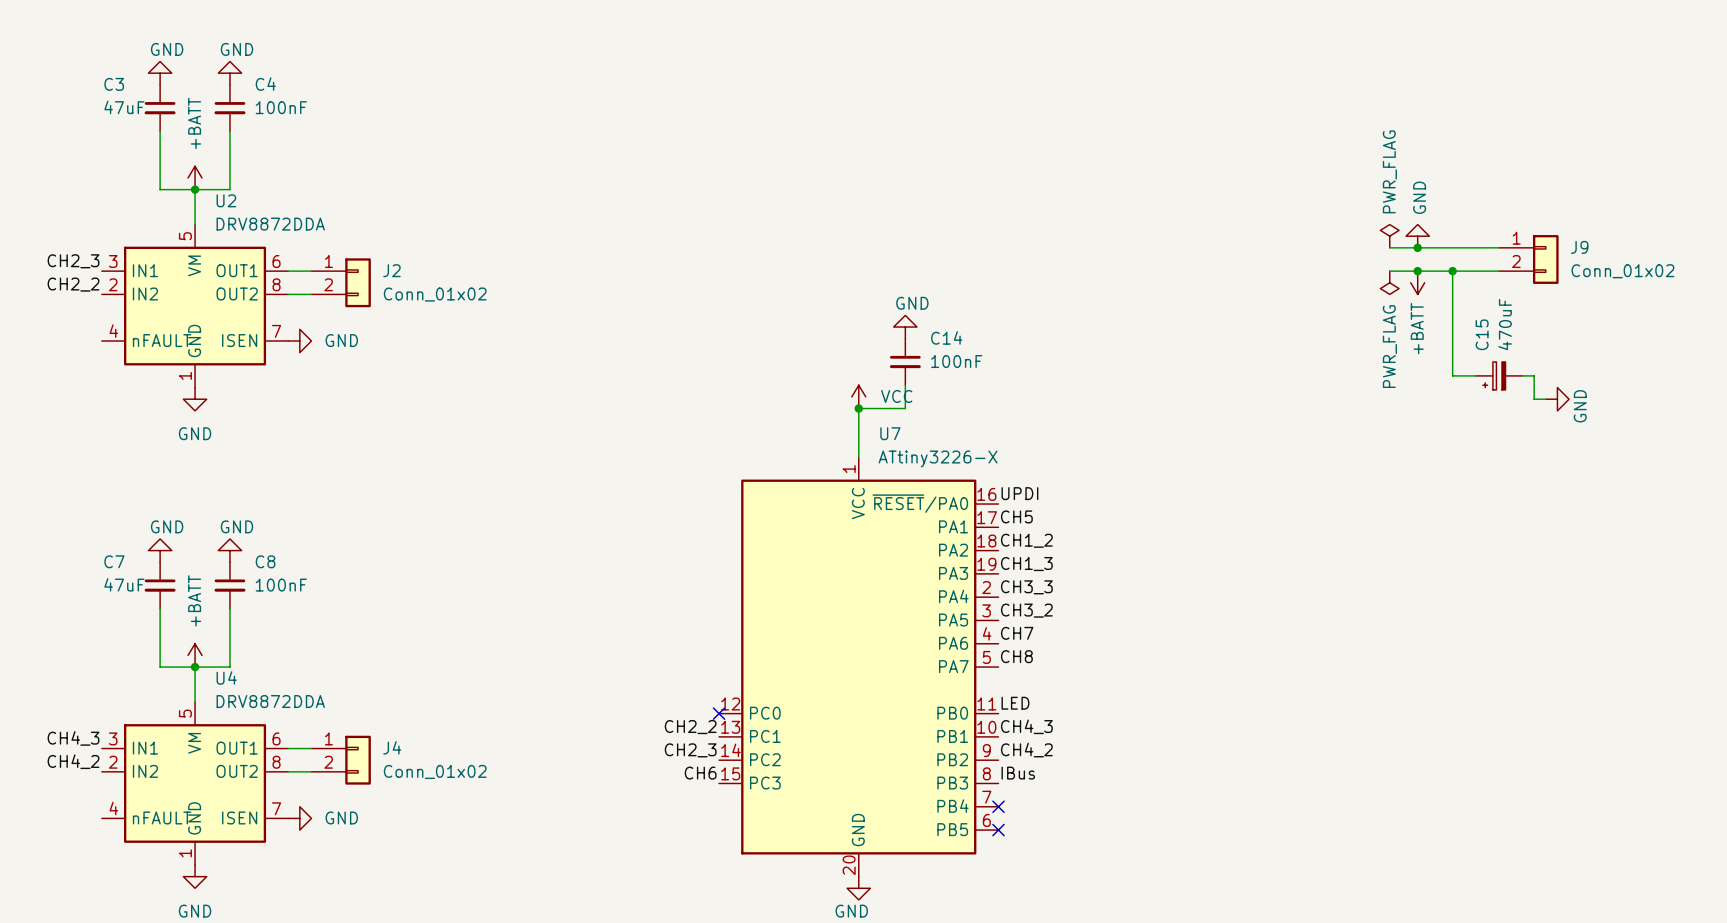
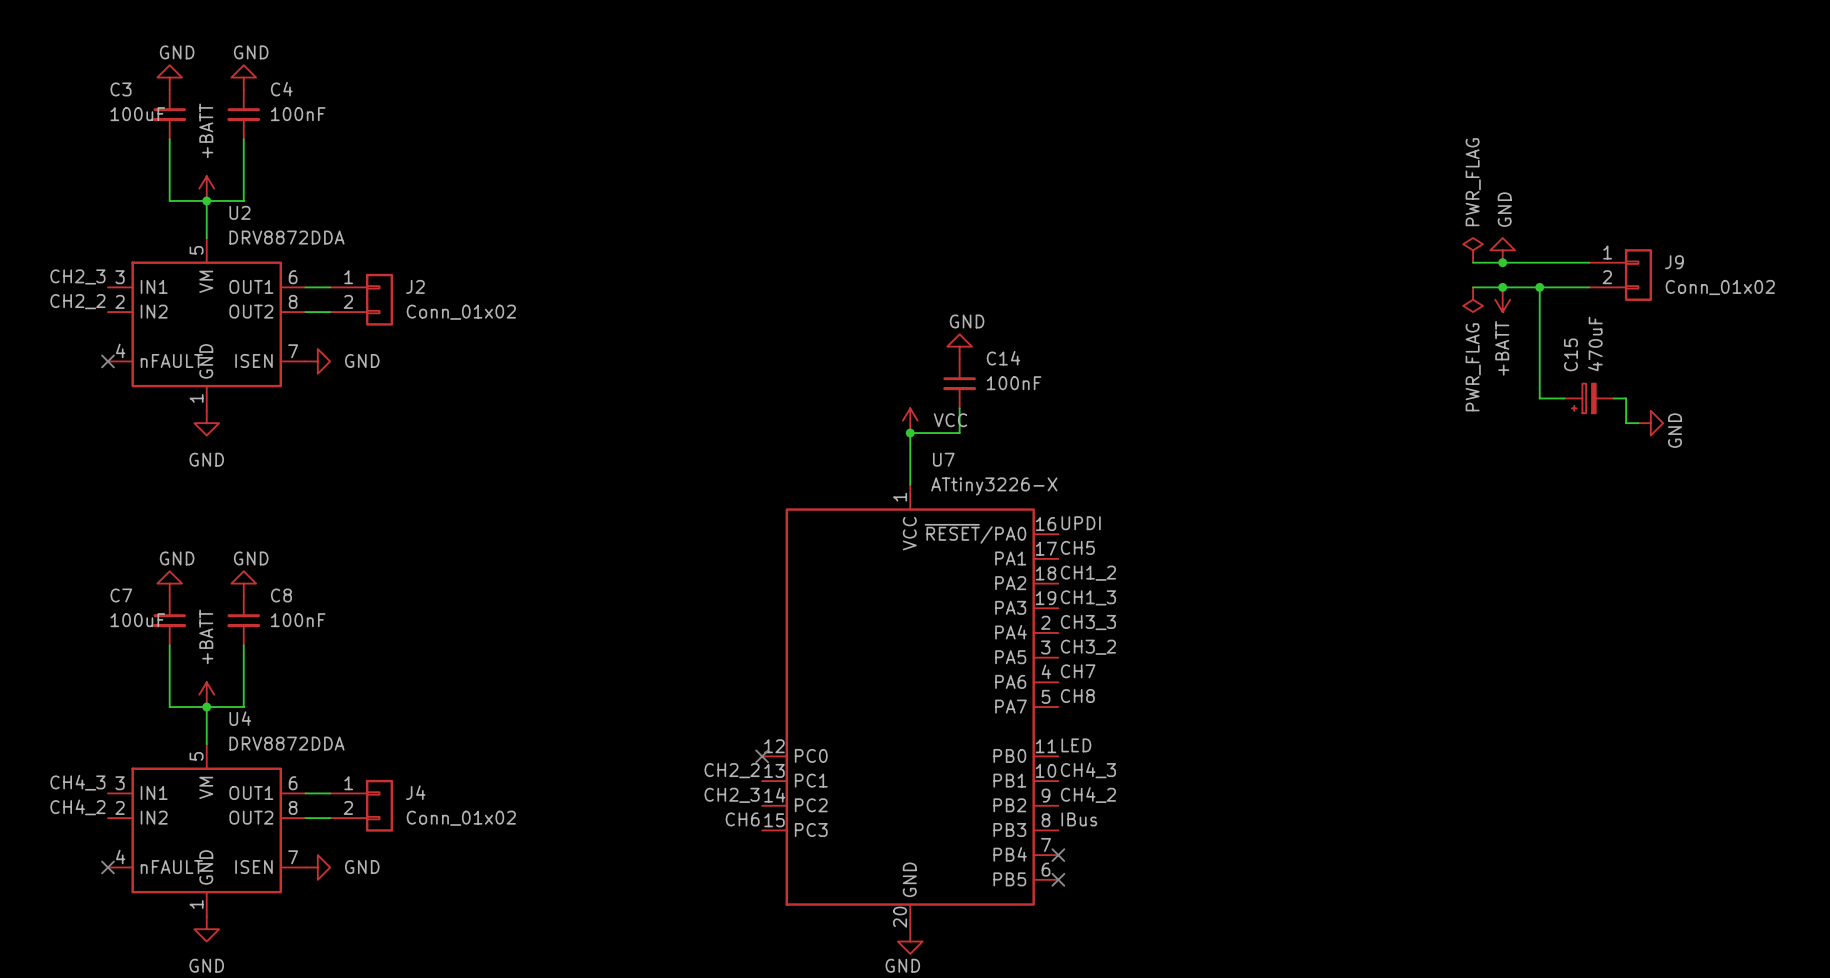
C3 value: 47uF (124, 107) -> 100uF (137, 114)
no-connect mark: none -> (107, 361)
C7 value: 47uF (124, 584) -> 100uF (137, 620)
no-connect mark: none -> (107, 867)

